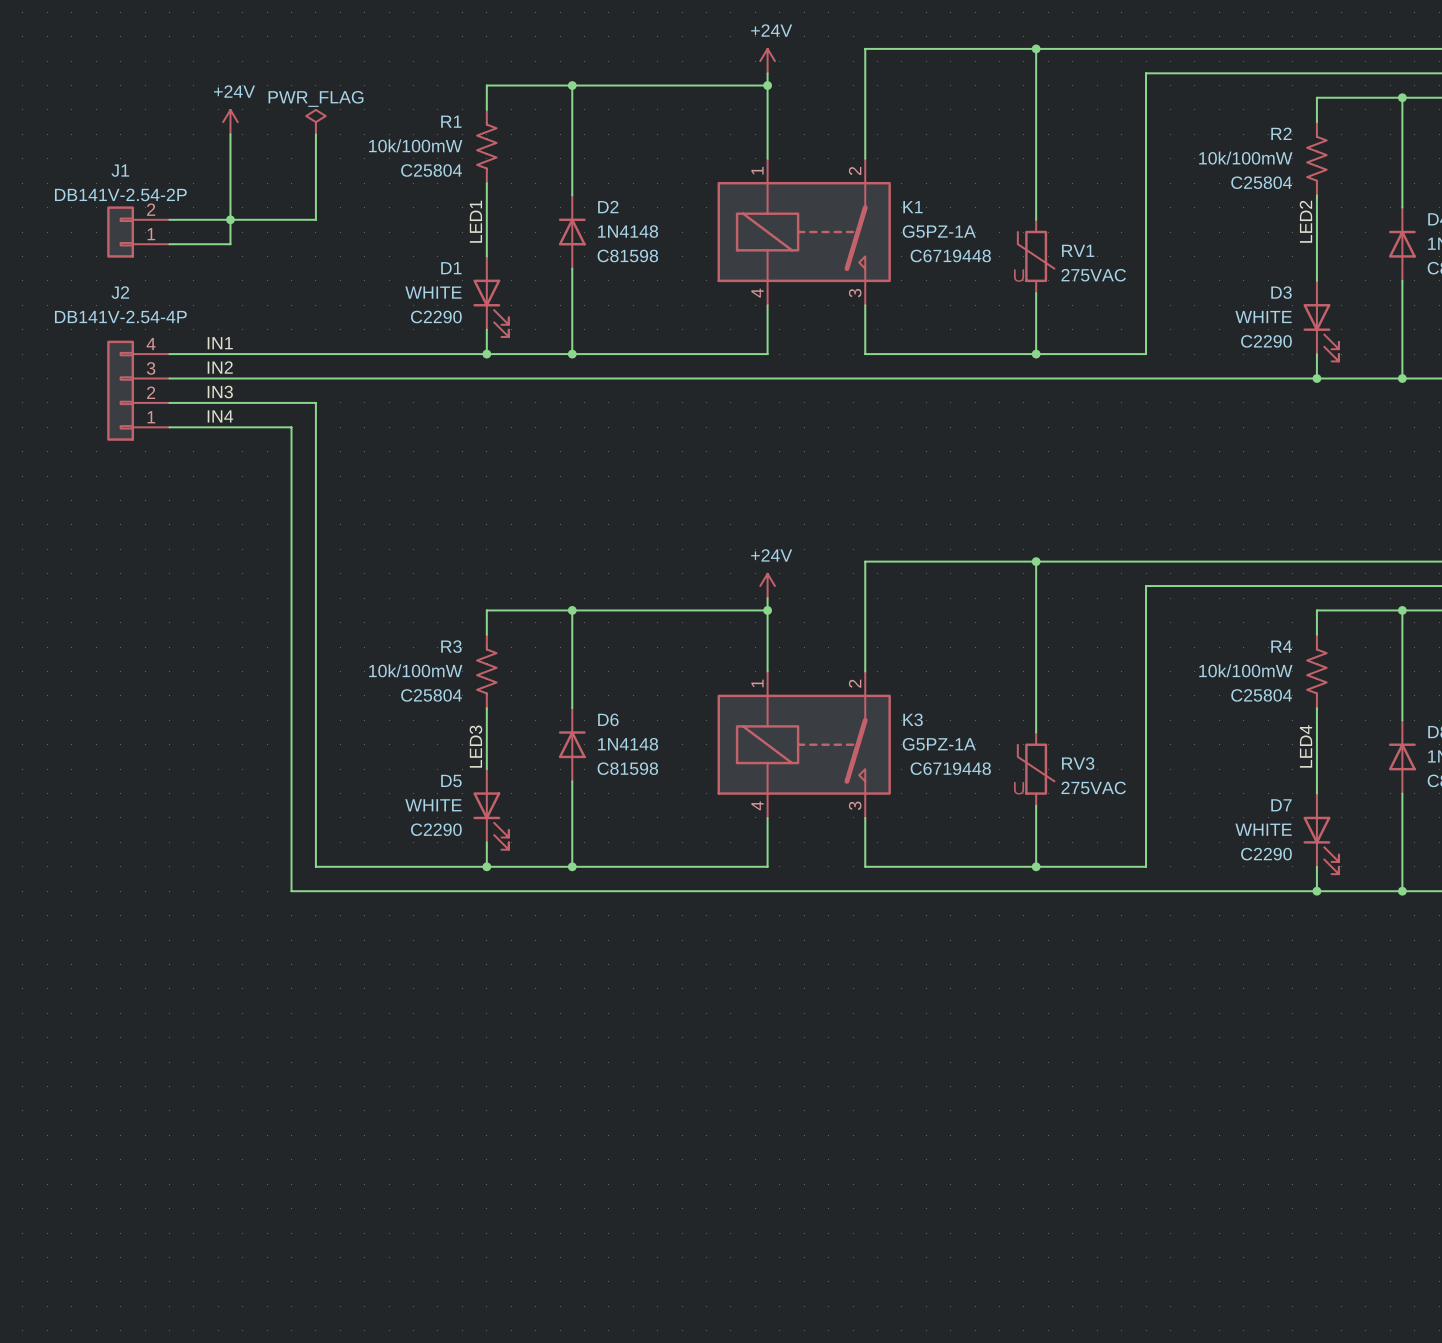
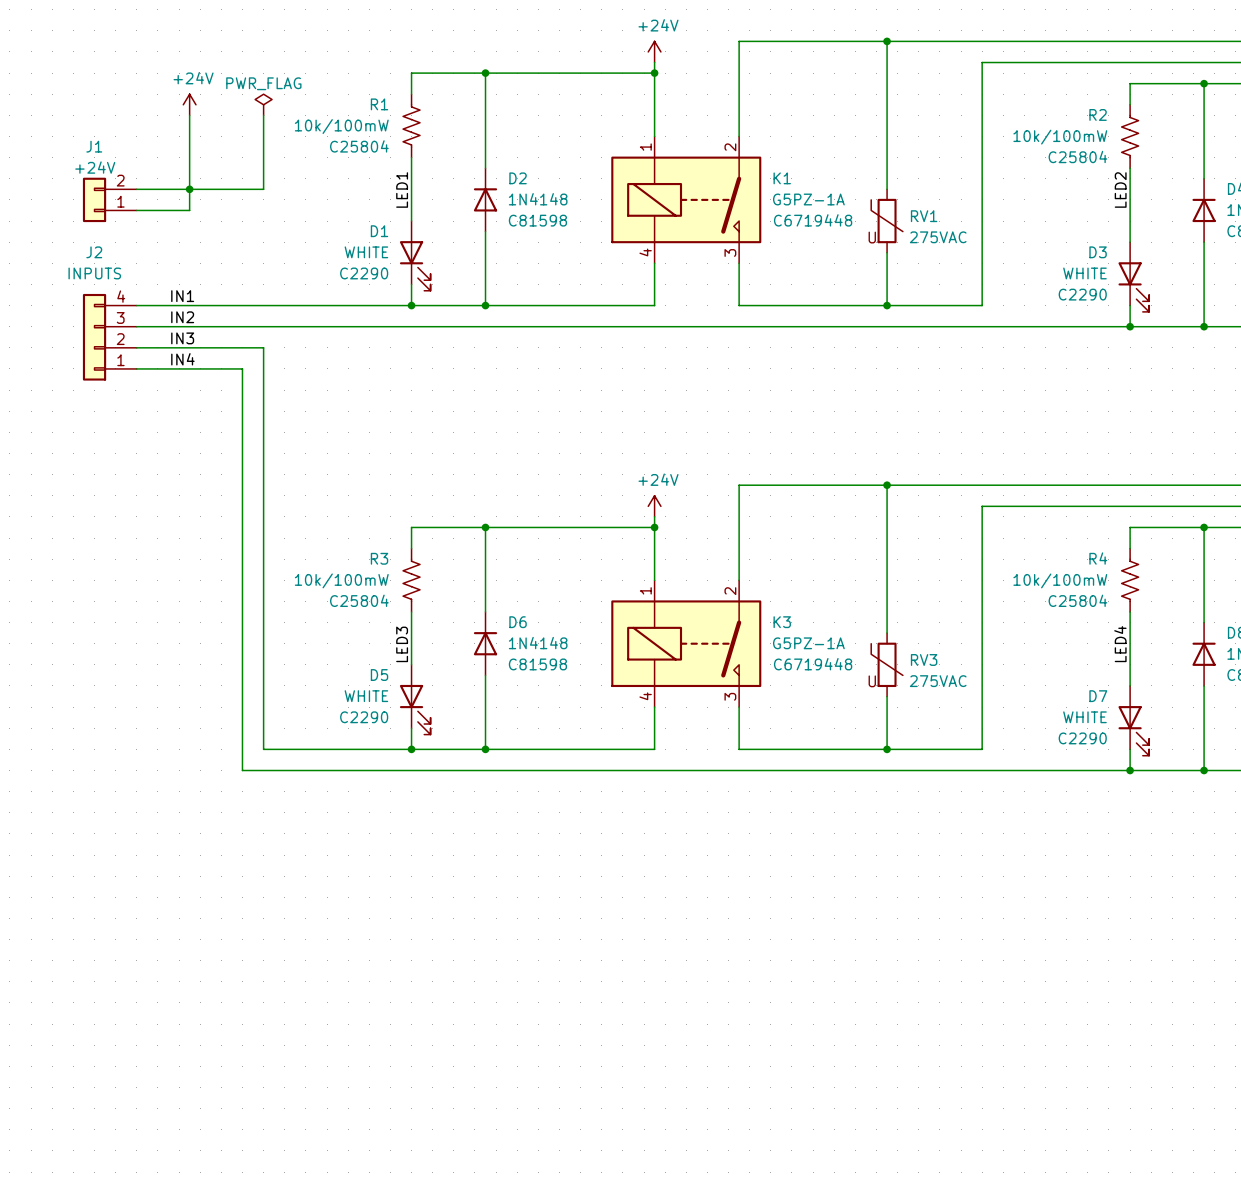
J1 value: DB141V-2.54-2P (120, 194) -> +24V (95, 167)
J2 value: DB141V-2.54-4P (120, 317) -> INPUTS (94, 273)

